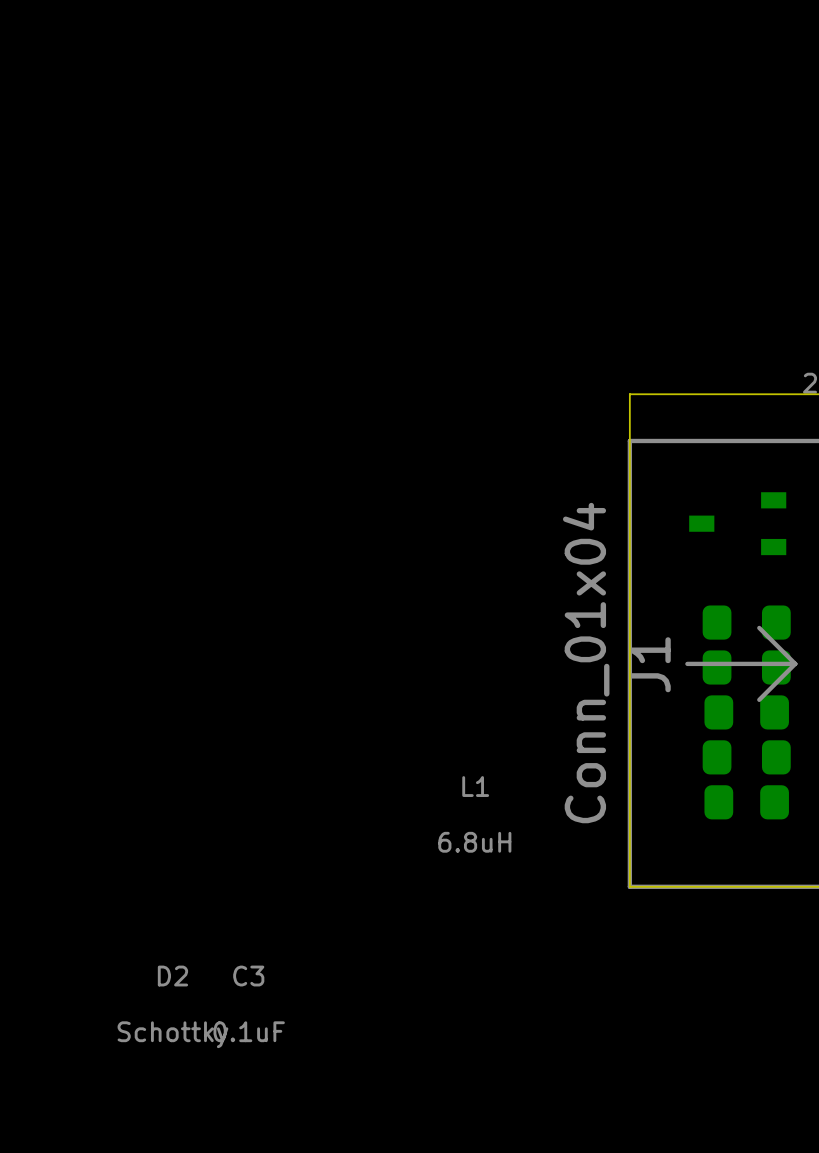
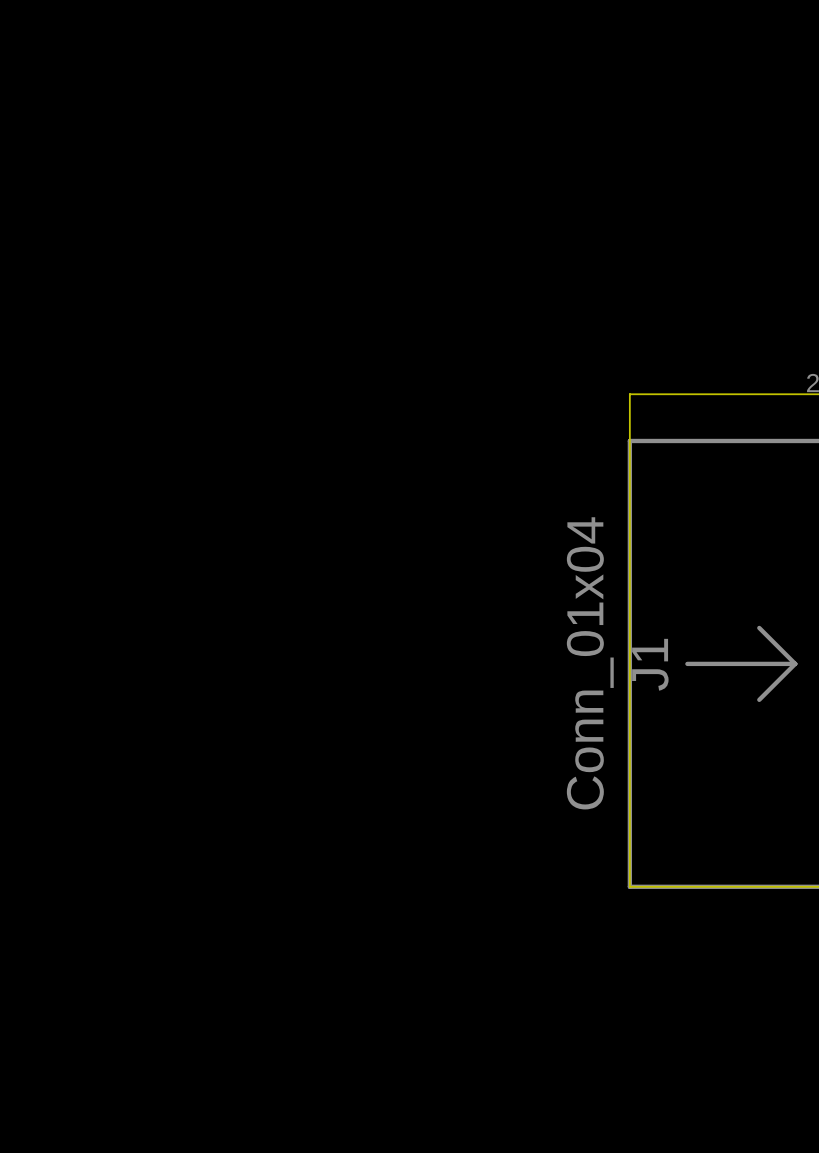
part: (737, 523) -> none
part: (746, 622) -> none
part: (746, 667) -> none
part: (746, 712) -> none
part: (746, 757) -> none
part: (746, 802) -> none
L1: 6.8uH (474, 814) -> none
C3: 0.1uF (249, 1003) -> none
D2: Schottky (172, 1006) -> none

